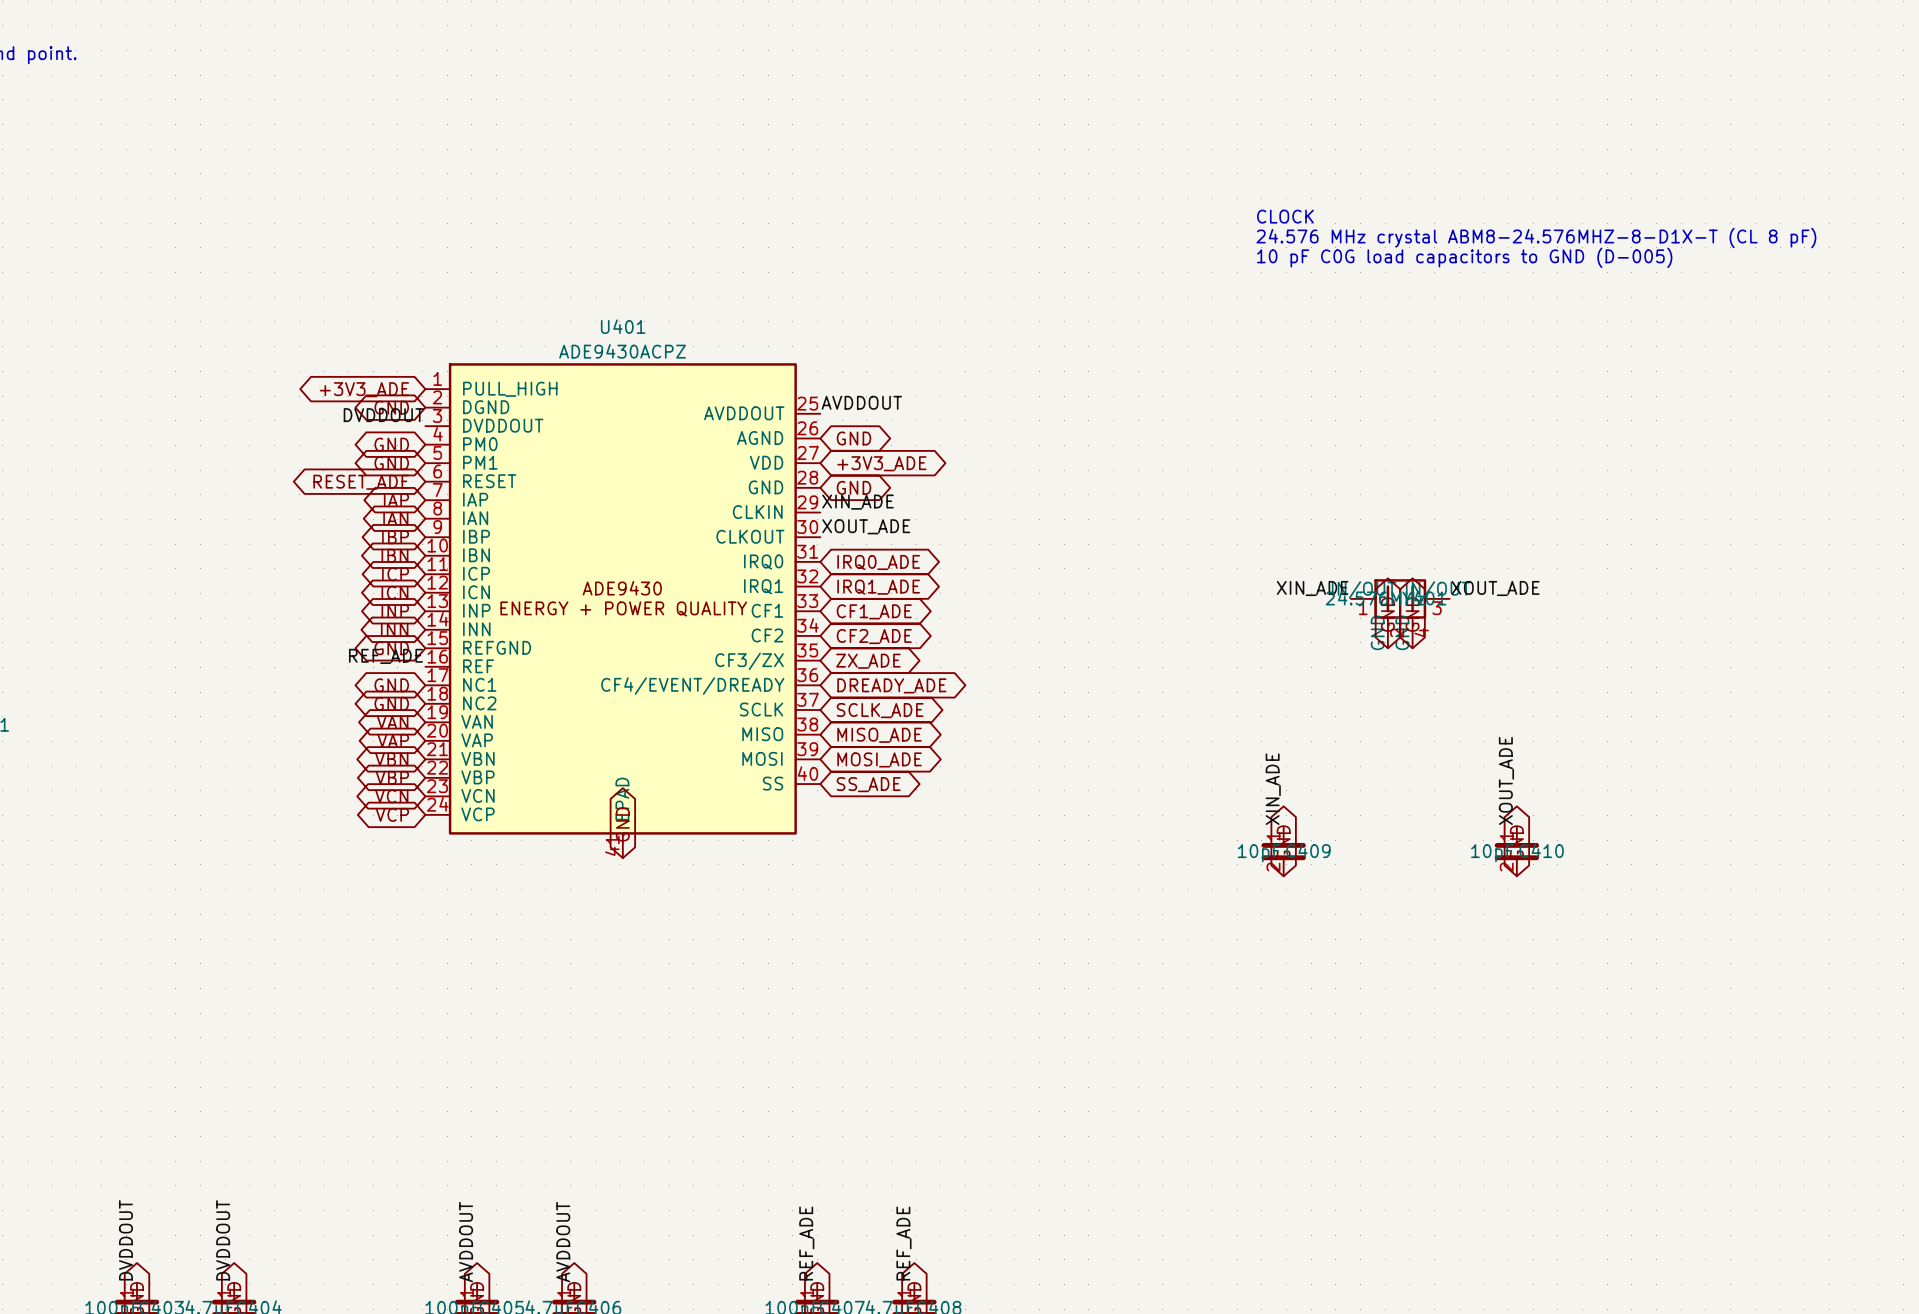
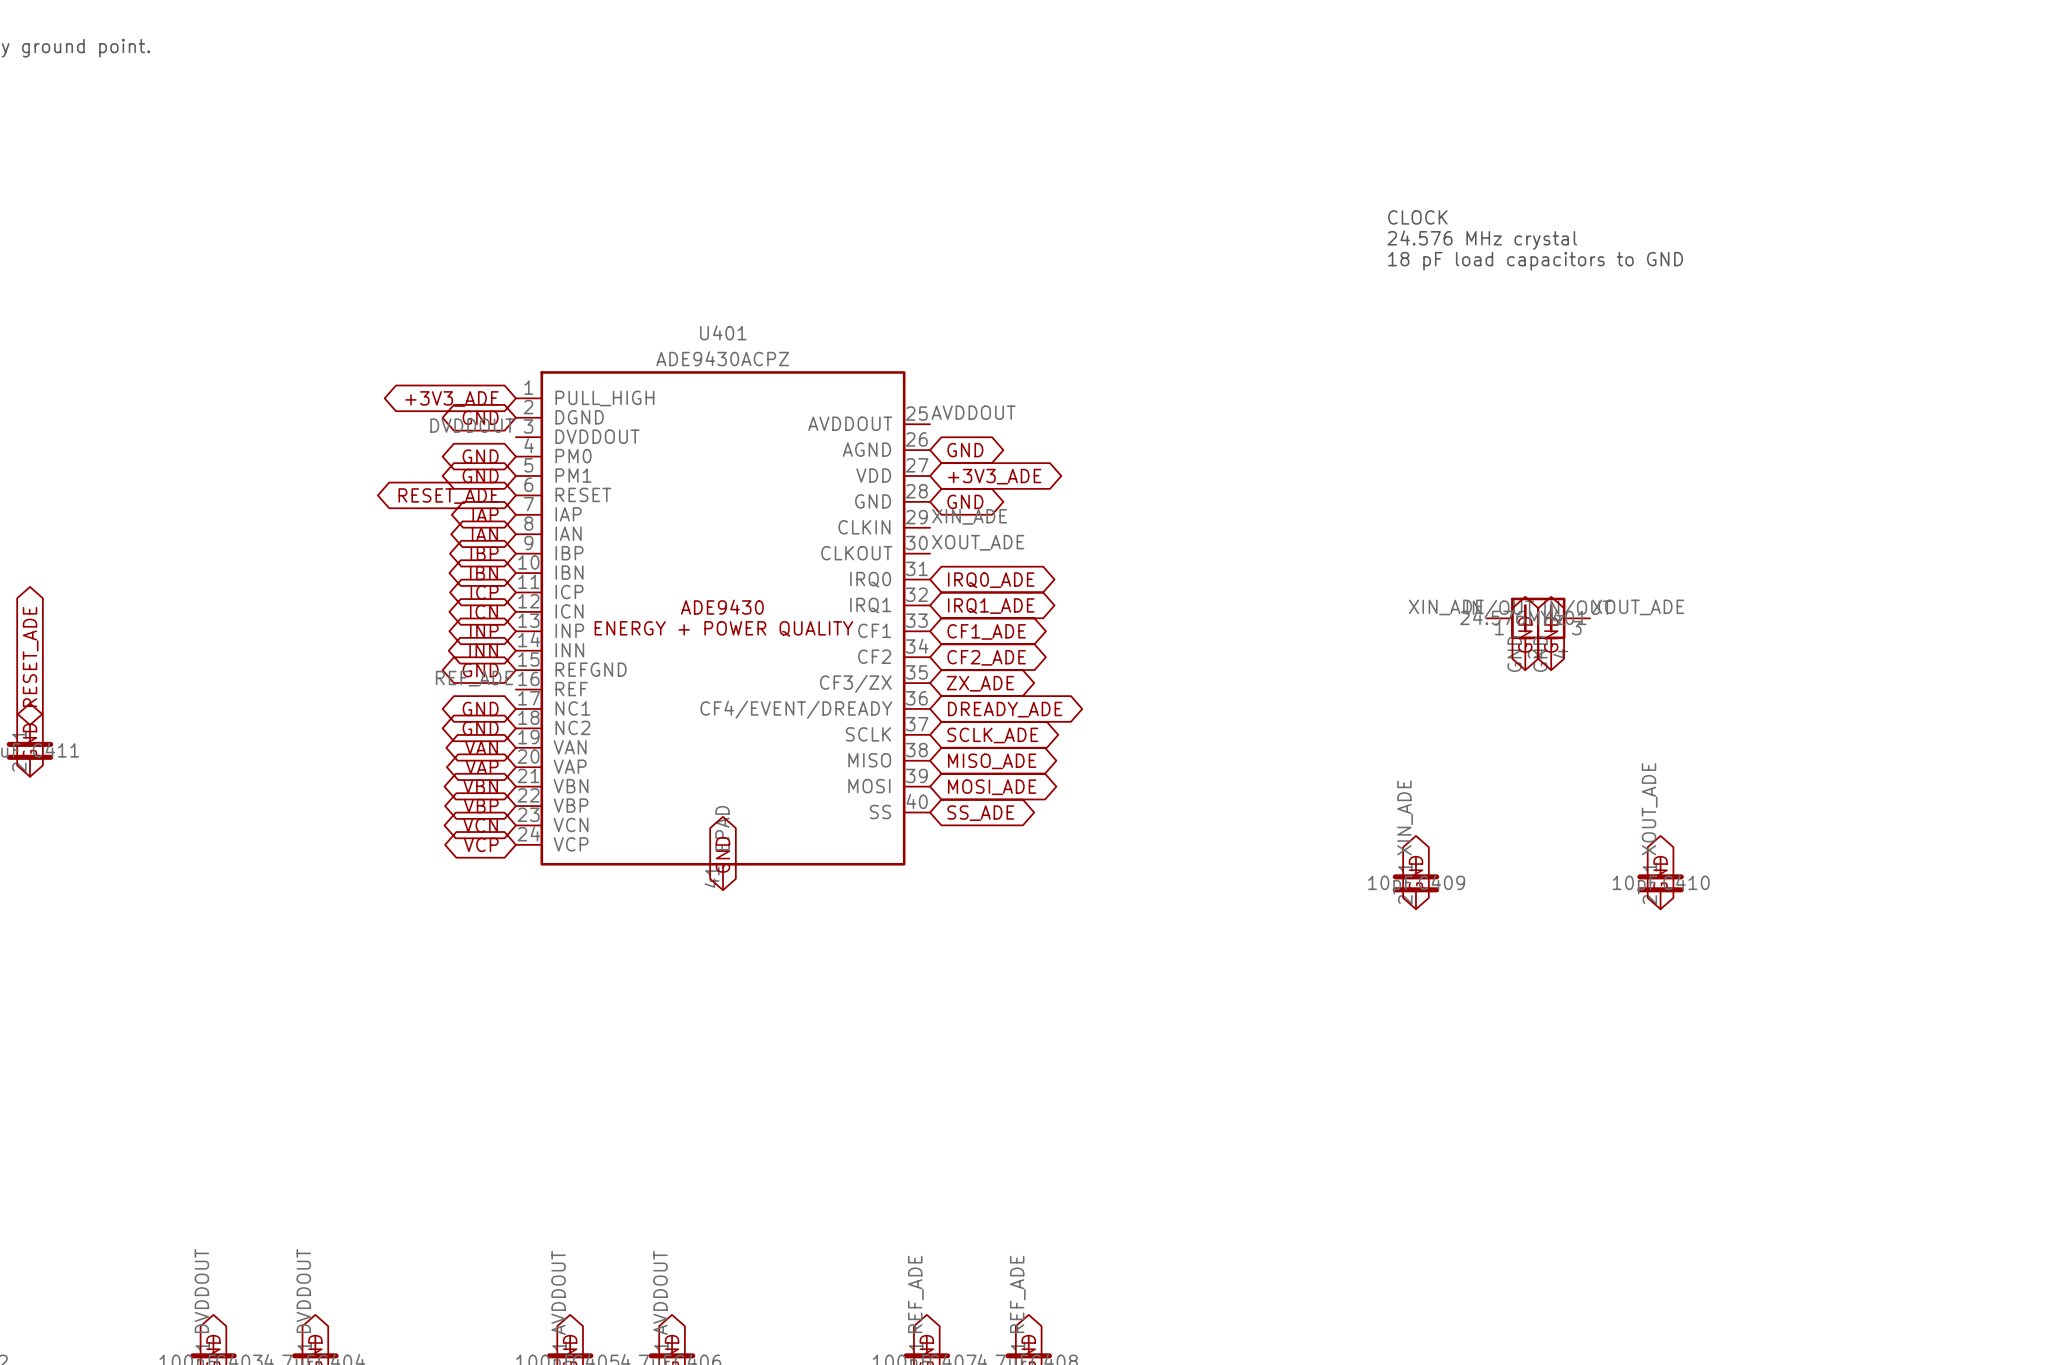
text: 24.576 MHz crystal ABM8-24.576MHZ-8-D1X-T (CL 8 pF) (1536, 237) -> 24.576 MHz crystal (1482, 240)
text: 10 pF C0G load capacitors to GND (D-005) (1464, 257) -> 18 pF load capacitors to GND (1535, 261)

